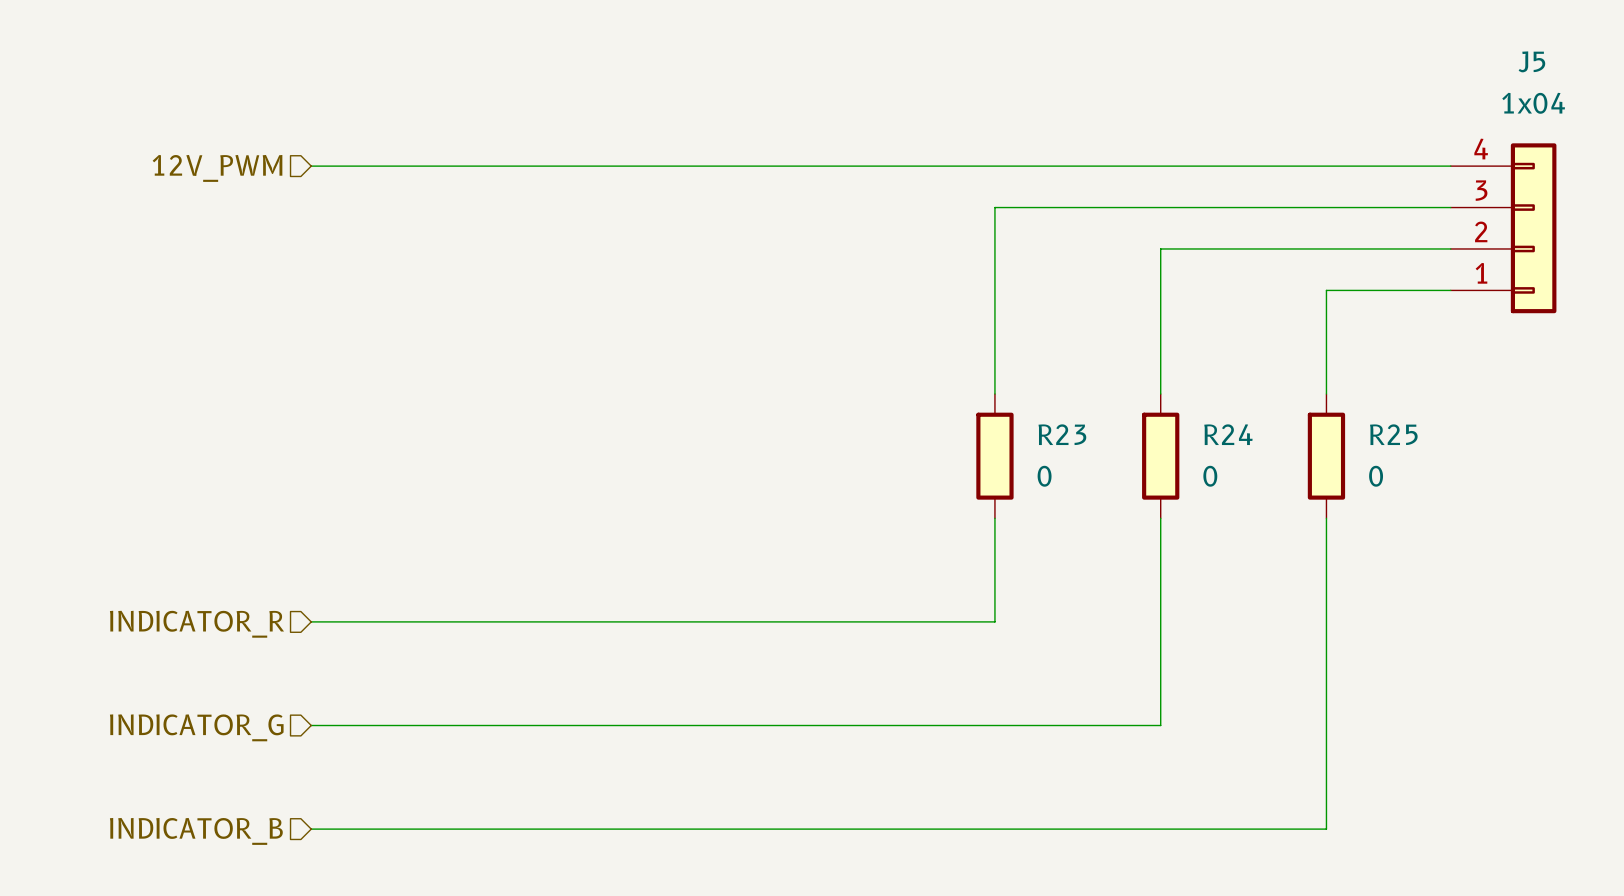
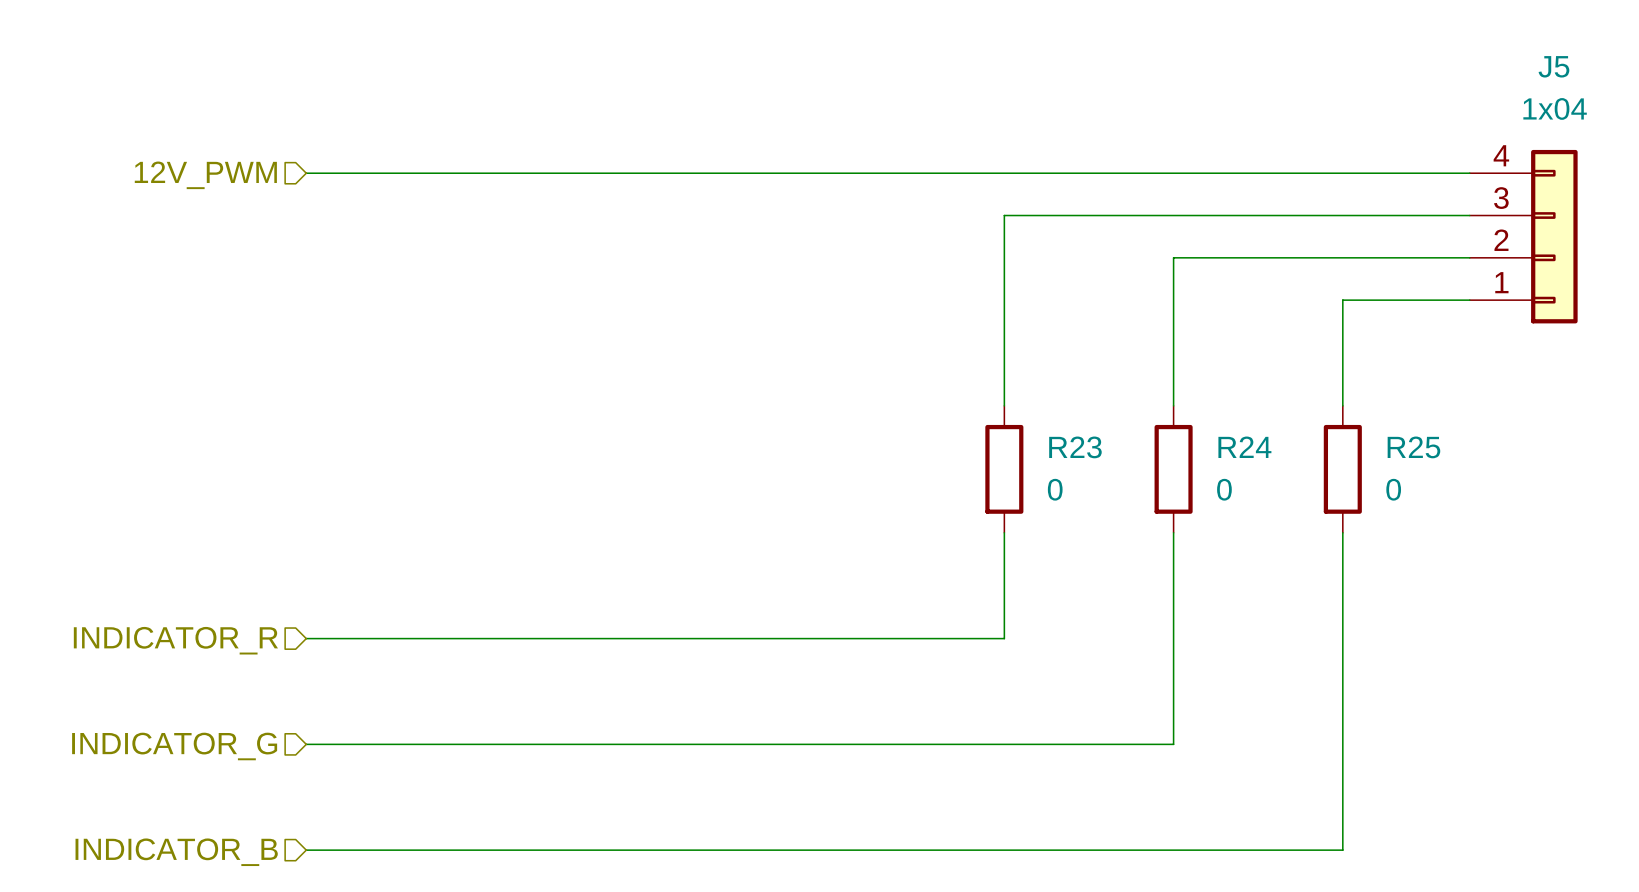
R23 symbol: [976, 394, 1014, 519] -> [985, 405, 1024, 533]
R24 symbol: [1142, 394, 1180, 519] -> [1154, 405, 1193, 533]
R25 symbol: [1307, 394, 1346, 519] -> [1323, 405, 1362, 533]

